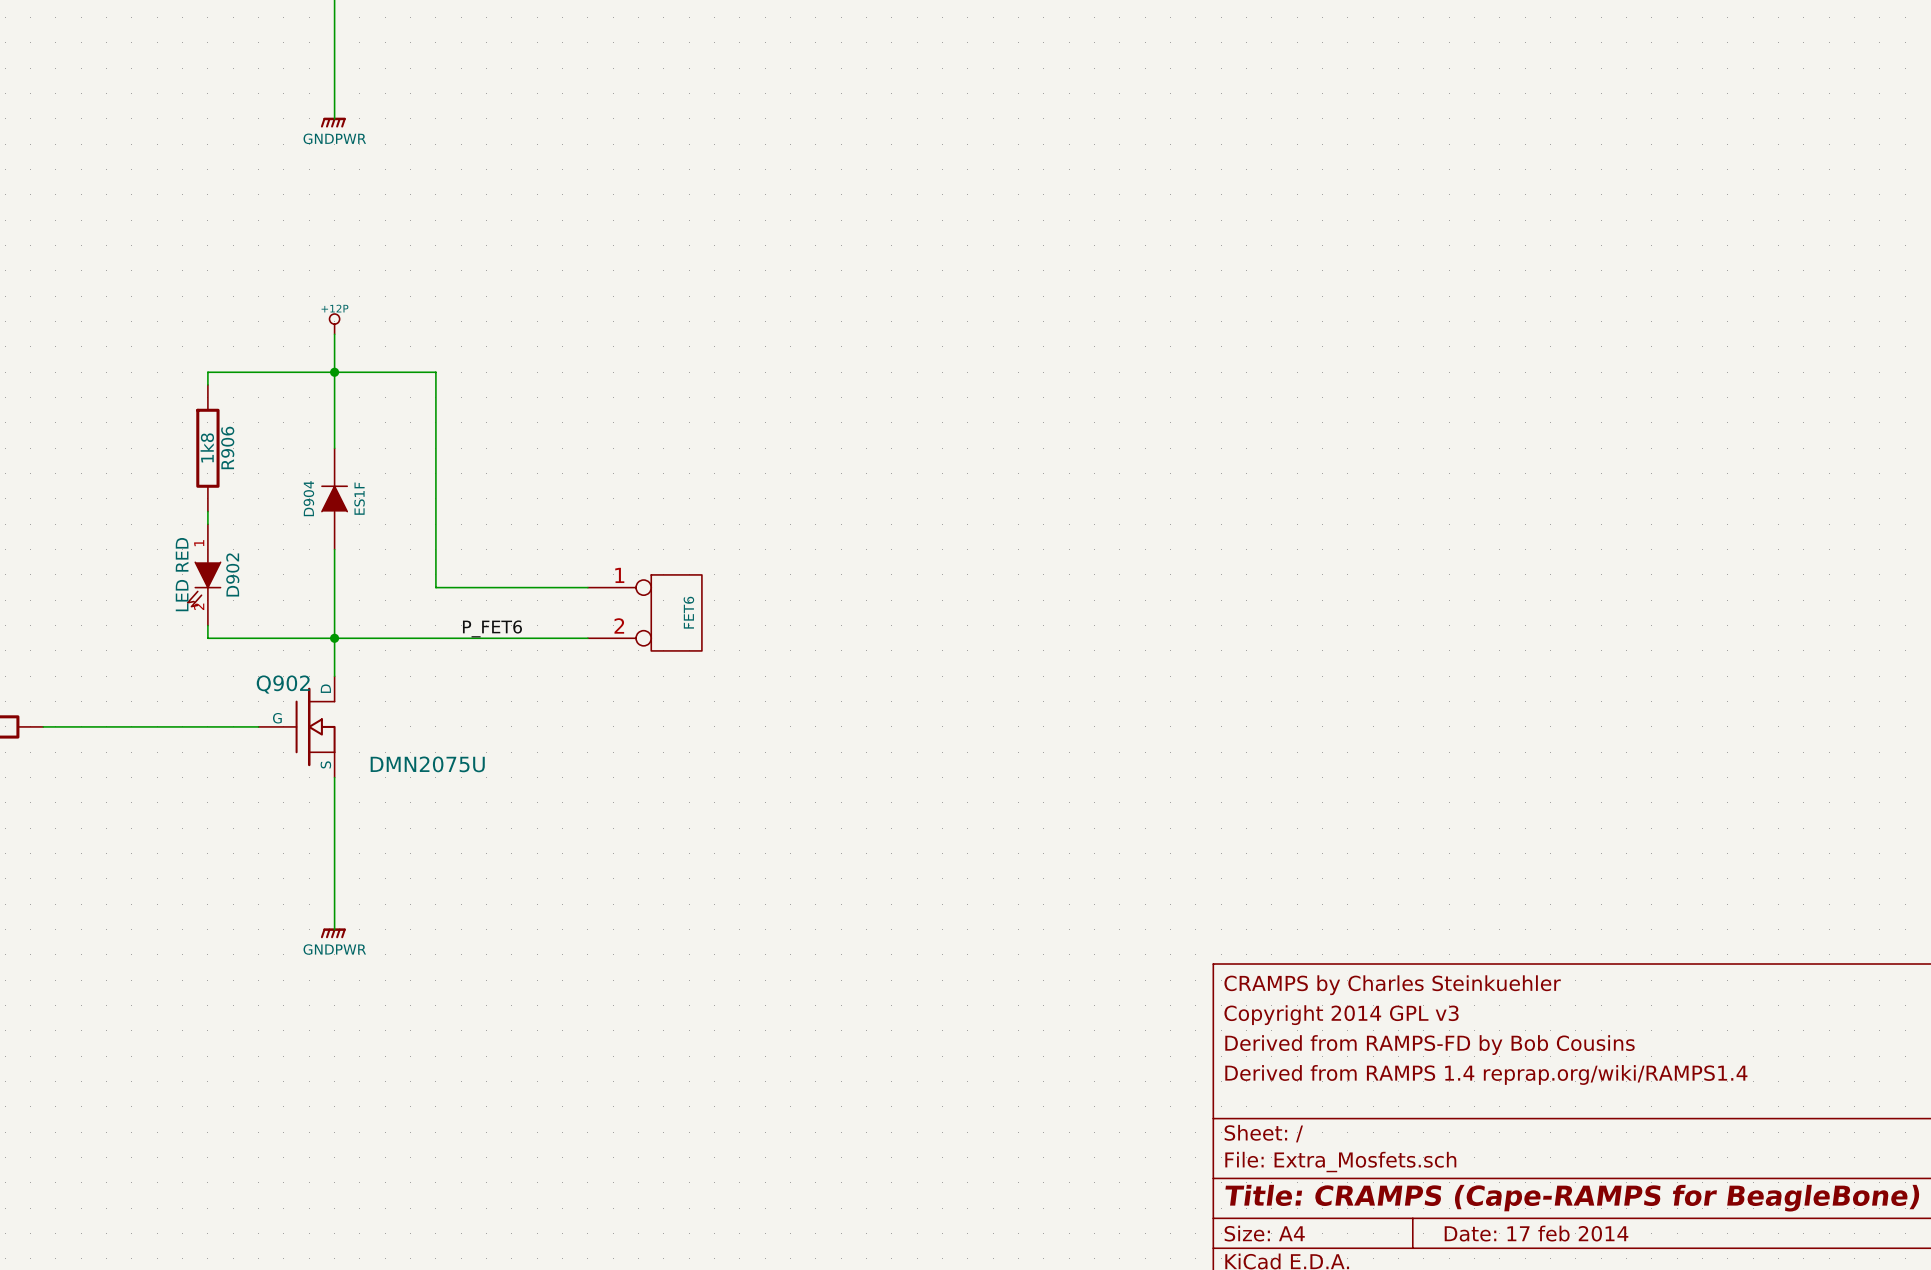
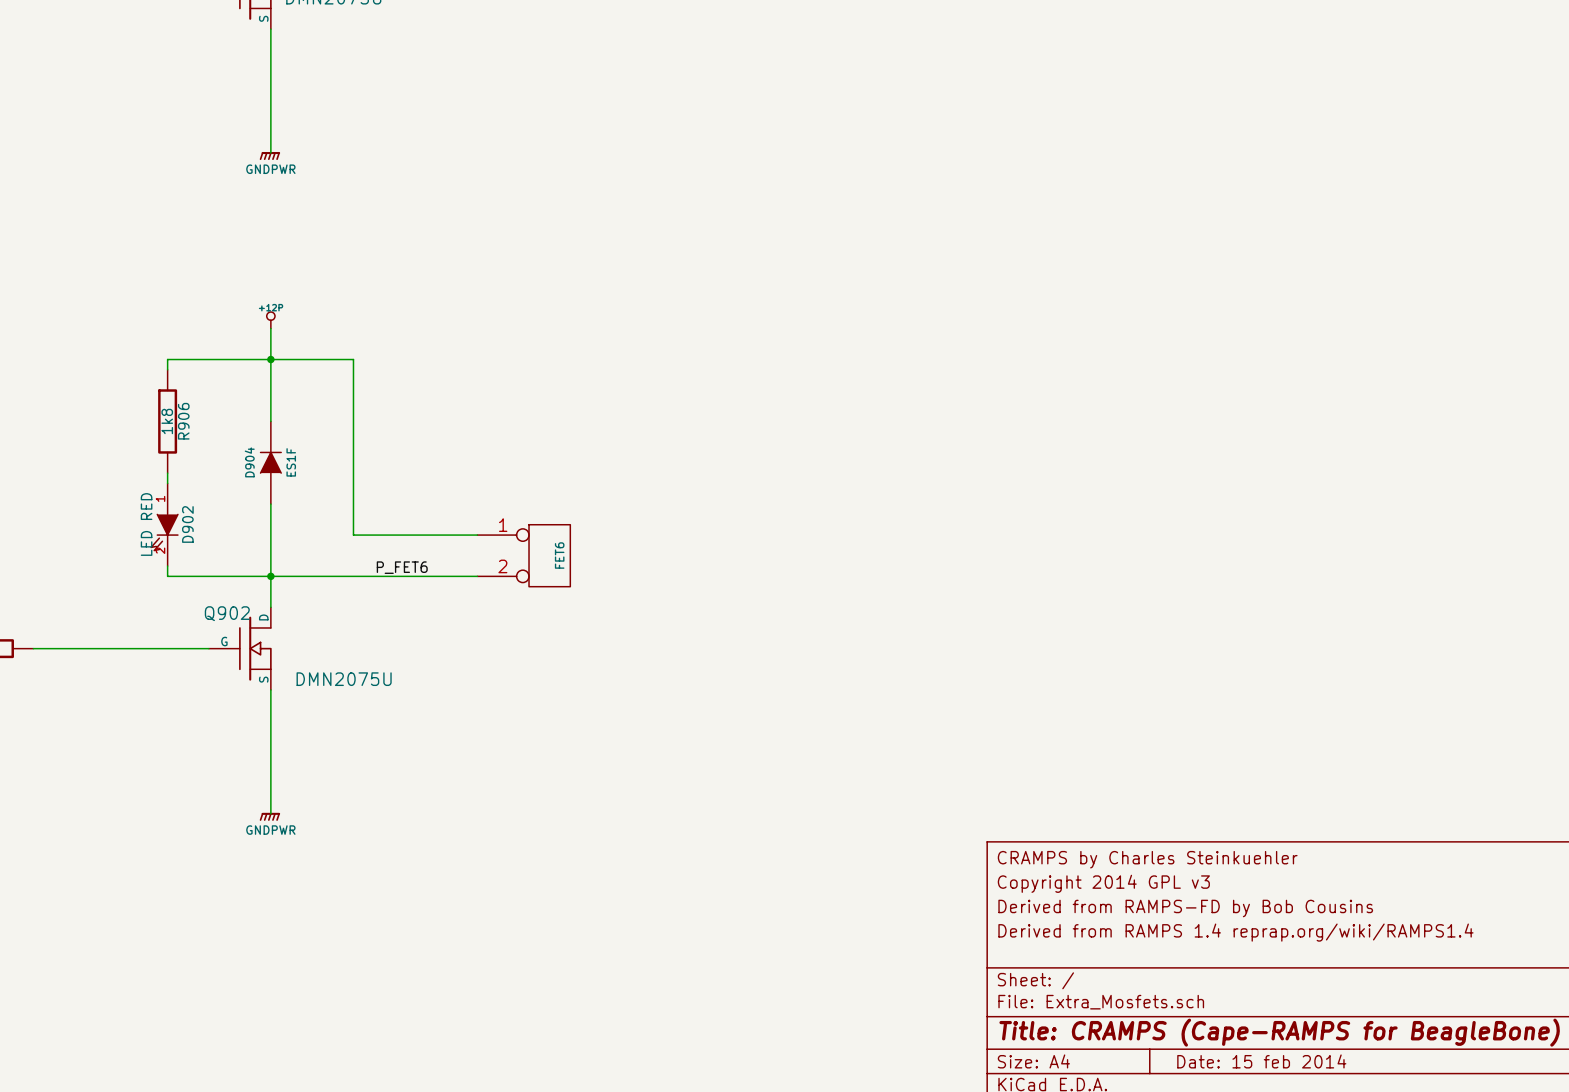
title block: Date: 17 feb 2014 (1536, 1233) -> Date: 15 feb 2014 (1261, 1061)

